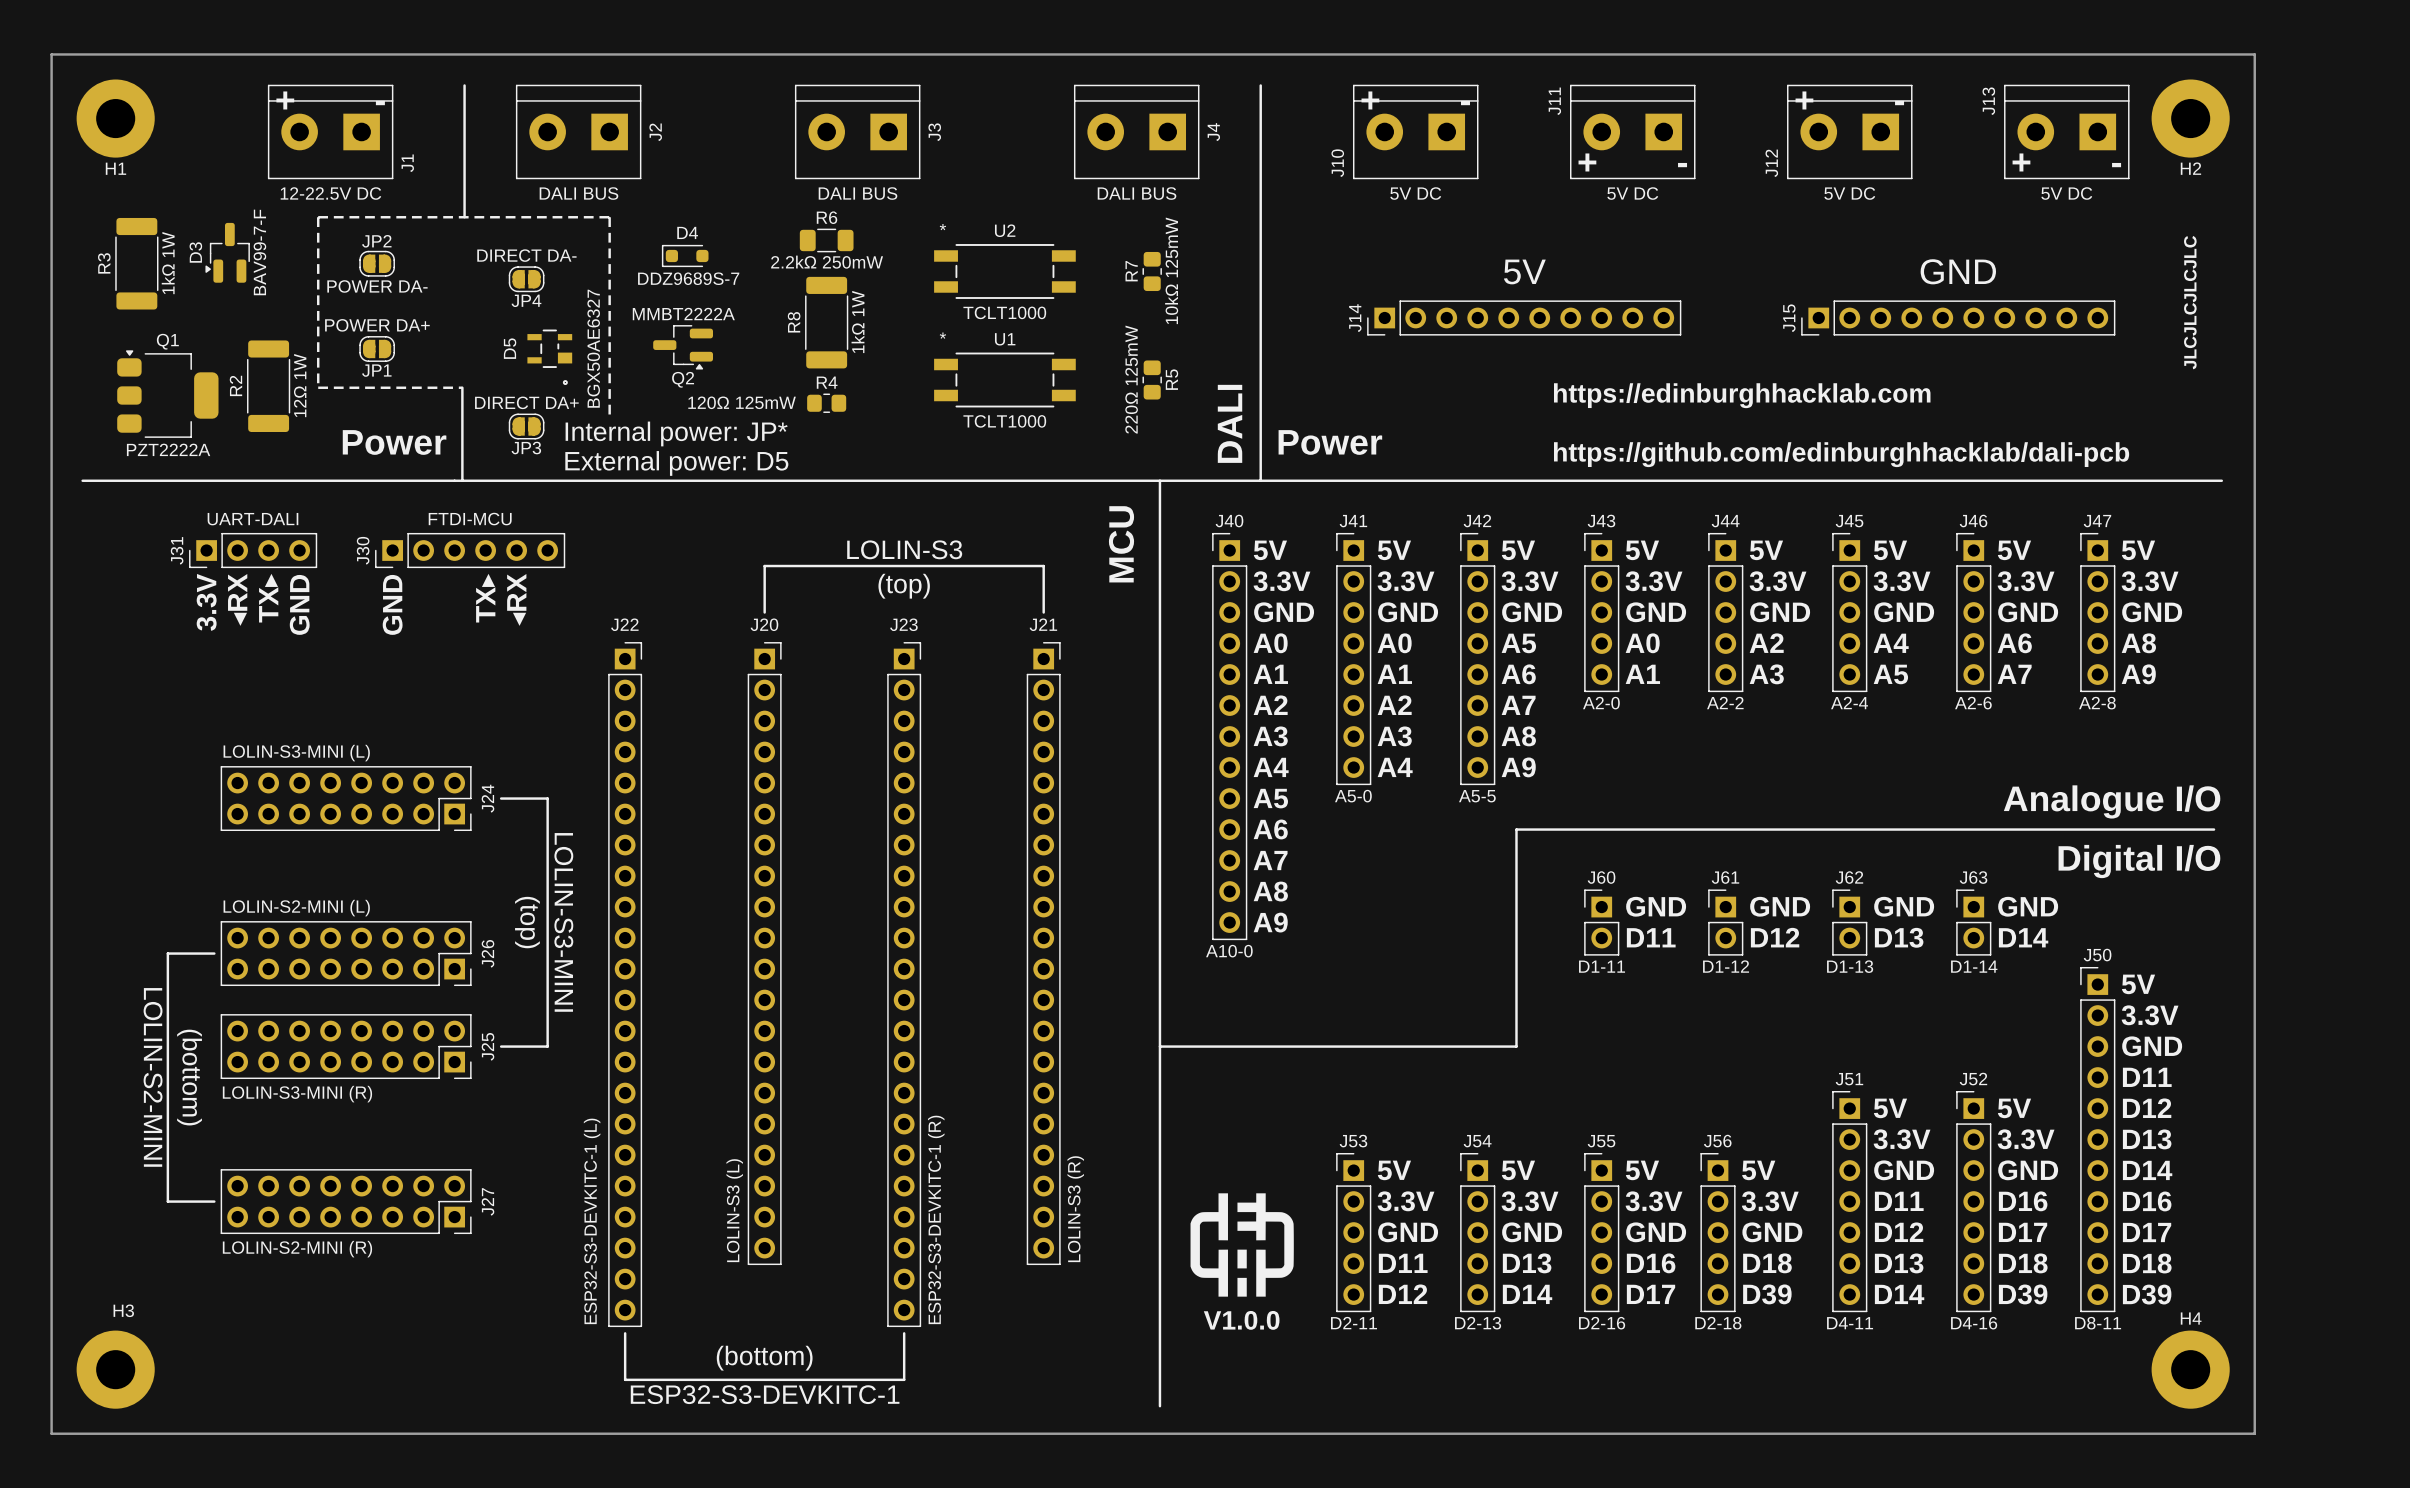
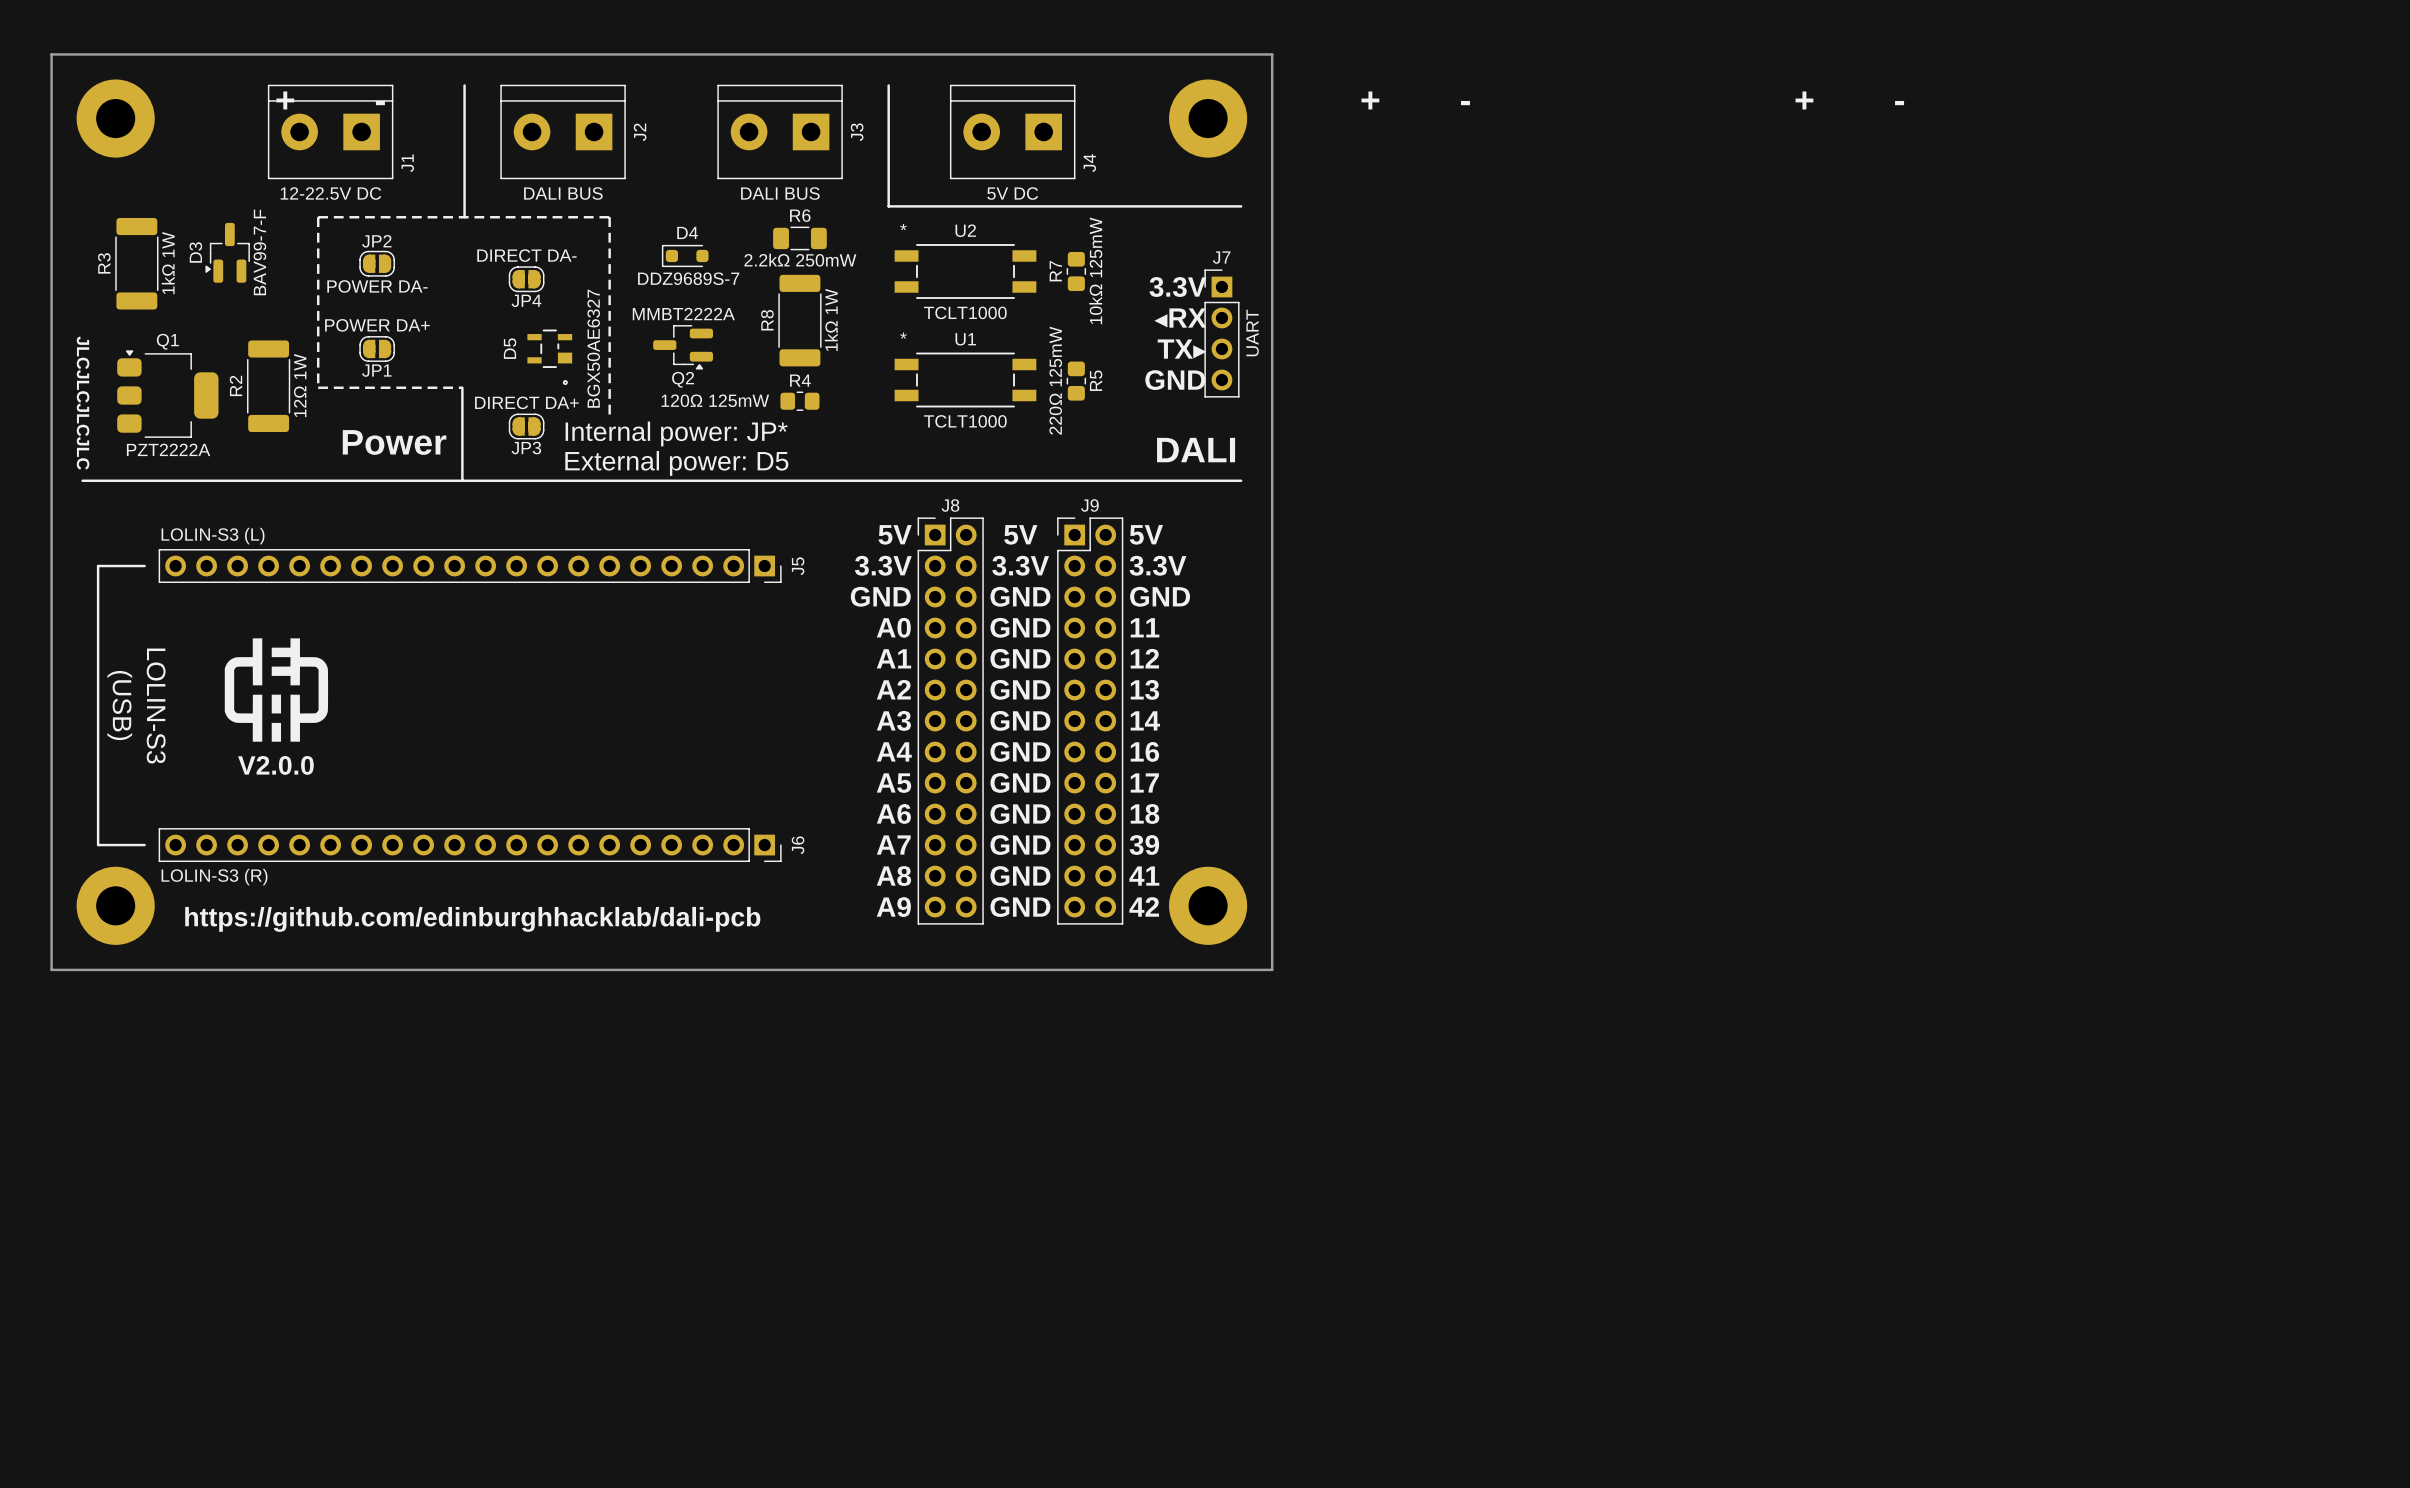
board edge: (1272, 54) (2254, 54) (2254, 1433) (51, 1433) (51, 969) -> (1272, 54) (1272, 969) (51, 969)
line: none -> (888, 85) (888, 206) (1241, 206)
line: (1260, 85) (1260, 480) -> none
part: none -> (1208, 118)
H2: (2190, 118) -> none
J2 position: (578, 131) -> (563, 131)
J3 position: (857, 131) -> (780, 131)
J4 position: (1136, 131) -> (1012, 131)
J10: 5V DC (1415, 131) -> none
J11: 5V DC (1632, 131) -> none
J12: 5V DC (1849, 131) -> none
J13: 5V DC (2066, 131) -> none
J4 name position: J4 (1213, 132) -> J4 (1089, 163)
text: + - (1632, 162) -> none
text: + - (2066, 162) -> none
H1 name: H1 (115, 168) -> none
J4 value: DALI BUS (1137, 193) -> 5V DC (1012, 193)
R6 position: (826, 240) -> (799, 238)
U2 position: (1004, 271) -> (965, 271)
R7 position: (1152, 271) -> (1076, 271)
text: 5V (1524, 271) -> none
text: GND (1958, 271) -> none
text: none -> 3.3V (1177, 287)
text: JLCJLCJLCJLC (2190, 302) -> none
J14: (1524, 317) -> none
J15: (1958, 317) -> none
text: none -> ◂RX (1180, 318)
R8 position: (826, 322) -> (799, 320)
J7: none -> UART (1221, 333)
text: none -> TX▸ (1182, 349)
U1 position: (1004, 380) -> (965, 380)
R5 position: (1152, 380) -> (1076, 381)
text: none -> GND (1175, 380)
text: https://edinburghhacklab.com (1742, 395) -> none
text: none -> JLCJLCJLCJLC (83, 403)
R4 position: (826, 403) -> (799, 401)
text rotation: 0° (1230, 423) -> 90° clockwise (1196, 450)
text: Power (1330, 442) -> none
text: https://github.com/edinburghhacklab/dali-pcb (1841, 454) -> none
line: (1159, 480) (1159, 1406) -> none
line: (1241, 480) (2221, 480) -> none
text: none -> 5V (895, 534)
text: none -> 5V (1020, 534)
text: none -> 5V (1146, 534)
text: MCU (1121, 544) -> none
text: LOLIN-S3 (904, 549) -> 3.3V (883, 565)
J31: UART-DALI (253, 550) -> none
J30: FTDI-MCU (470, 550) -> none
text: 5V (1270, 550) -> none
text: 5V (1394, 550) -> none
text: 5V (1518, 550) -> none
text: 5V (1642, 550) -> none
text: 5V (1766, 550) -> none
text: 5V (1890, 550) -> none
text: 5V (2014, 550) -> none
text: 5V (2138, 550) -> none
text: none -> 3.3V (1020, 565)
text: none -> 3.3V (1157, 565)
line: none -> (144, 566) (98, 566) (98, 845) (144, 845)
J5: none -> LOLIN-S3 (L) (470, 566)
text: 3.3V (1282, 581) -> none
text: 3.3V (1406, 581) -> none
text: 3.3V (1530, 581) -> none
text: 3.3V (1654, 581) -> none
text: 3.3V (1778, 581) -> none
text: 3.3V (1902, 581) -> none
text: 3.3V (2026, 581) -> none
text: 3.3V (2150, 581) -> none
text: (top) (904, 586) -> GND (880, 596)
text: none -> GND (1020, 596)
text: none -> GND (1160, 596)
text: TX▸ (268, 598) -> none
text: TX▸ (485, 598) -> none
text: ◂RX (237, 599) -> none
text: ◂RX (516, 599) -> none
text: 3.3V (206, 602) -> none
text: GND (299, 604) -> none
text: GND (392, 604) -> none
line: (764, 612) (764, 566) (1043, 566) (1043, 612) -> none
text: GND (1284, 612) -> none
text: GND (1408, 612) -> none
text: GND (1532, 612) -> none
J43: A2-0 (1601, 612) -> none
text: GND (1656, 612) -> none
J44: A2-2 (1725, 612) -> none
text: GND (1780, 612) -> none
J45: A2-4 (1849, 612) -> none
text: GND (1904, 612) -> none
J46: A2-6 (1973, 612) -> none
text: GND (2028, 612) -> none
J47: A2-8 (2097, 612) -> none
text: GND (2152, 612) -> none
text: none -> A0 (893, 627)
text: none -> GND (1020, 627)
text: none -> 11 (1145, 627)
drawing: none -> [224, 638, 329, 742]
text: A0 (1270, 643) -> none
text: A0 (1394, 643) -> none
text: A5 (1518, 643) -> none
text: A0 (1642, 643) -> none
text: A2 (1766, 643) -> none
text: A4 (1891, 643) -> none
text: A6 (2014, 643) -> none
text: A8 (2138, 643) -> none
text: none -> A1 (893, 658)
text: none -> GND (1020, 658)
text: none -> 12 (1144, 658)
J41: A5-0 (1353, 659) -> none
J42: A5-5 (1477, 659) -> none
text: A1 (1270, 674) -> none
text: A1 (1394, 674) -> none
text: A6 (1518, 674) -> none
text: A1 (1642, 674) -> none
text: A3 (1766, 674) -> none
text: A5 (1890, 674) -> none
text: A7 (2014, 674) -> none
text: A9 (2138, 674) -> none
text: none -> A2 (893, 689)
text: none -> GND (1020, 689)
text: none -> 13 (1144, 689)
text: none -> (USB) (119, 705)
text: A2 (1270, 705) -> none
text: A2 (1394, 705) -> none
text: A7 (1518, 705) -> none
text: none -> LOLIN-S3 (156, 706)
text: none -> A3 (893, 720)
text: none -> GND (1020, 720)
text: none -> 14 (1145, 720)
J8: none -> (950, 721)
J9: none -> (1090, 721)
J40: A10-0 (1229, 736) -> none
text: A3 (1270, 736) -> none
text: A3 (1394, 736) -> none
text: A8 (1518, 736) -> none
text: none -> A4 (894, 751)
text: none -> GND (1020, 751)
text: none -> 16 (1144, 751)
text: none -> V2.0.0 (275, 765)
text: A4 (1271, 767) -> none
text: A4 (1395, 767) -> none
text: A9 (1518, 767) -> none
text: none -> GND (1020, 782)
text: none -> 17 (1144, 782)
text: none -> A5 (893, 783)
J24: LOLIN-S3-MINI (L) (346, 798) -> none
line: (501, 798) (547, 798) (547, 1046) (501, 1046) -> none
text: A5 (1270, 798) -> none
text: Analogue I/O (2112, 801) -> none
text: none -> A6 (893, 813)
text: none -> GND (1020, 813)
text: none -> 18 (1144, 813)
text: A6 (1270, 829) -> none
line: (2214, 829) (1516, 829) (1516, 1046) (1159, 1046) -> none
J6: none -> LOLIN-S3 (R) (470, 845)
text: none -> A7 (893, 845)
text: none -> GND (1020, 845)
text: none -> 39 (1144, 845)
text: A7 (1270, 860) -> none
text: Digital I/O (2139, 861) -> none
text: none -> A8 (893, 876)
text: none -> GND (1020, 876)
text: none -> 41 (1144, 876)
text: A8 (1270, 891) -> none
part: none -> (115, 905)
part: none -> (1208, 905)
text: none -> 42 (1144, 906)
text: GND (1656, 906) -> none
text: GND (1780, 906) -> none
text: GND (1904, 906) -> none
text: GND (2028, 906) -> none
text: none -> A9 (893, 907)
text: none -> GND (1020, 907)
text: none -> https://github.com/edinburghhacklab/dali-pcb (472, 919)
text: (top) (527, 922) -> none
text: LOLIN-S3-MINI (563, 922) -> none
text: A9 (1270, 922) -> none
J60: D1-11 (1601, 922) -> none
J61: D1-12 (1725, 922) -> none
J62: D1-13 (1849, 922) -> none
J63: D1-14 (1973, 922) -> none
text: D11 (1651, 937) -> none
text: D12 (1775, 937) -> none
text: D13 (1899, 937) -> none
text: D14 (2023, 937) -> none
line: (214, 953) (167, 953) (167, 1201) (214, 1201) -> none
J26: LOLIN-S2-MINI (L) (346, 953) -> none
J20: LOLIN-S3 (L) (764, 953) -> none
J21: LOLIN-S3 (R) (1043, 953) -> none
J22: ESP32-S3-DEVKITC-1 (L) (625, 984) -> none
J23: ESP32-S3-DEVKITC-1 (R) (904, 984) -> none
text: 5V (2138, 984) -> none
text: 3.3V (2150, 1015) -> none
J25: LOLIN-S3-MINI (R) (346, 1046) -> none
text: GND (2152, 1046) -> none
text: LOLIN-S2-MINI (153, 1077) -> none
text: (bottom) (189, 1077) -> none
text: D11 (2147, 1077) -> none
text: 5V (1890, 1108) -> none
text: 5V (2014, 1108) -> none
text: D12 (2147, 1108) -> none
text: 3.3V (1902, 1139) -> none
text: 3.3V (2026, 1139) -> none
J50: D8-11 (2097, 1139) -> none
text: D13 (2147, 1139) -> none
text: 5V (1394, 1170) -> none
text: 5V (1518, 1170) -> none
text: 5V (1642, 1170) -> none
text: 5V (1758, 1170) -> none
text: GND (1904, 1170) -> none
text: GND (2028, 1170) -> none
text: D14 (2147, 1170) -> none
drawing: [1190, 1193, 1294, 1297] -> none
J27: LOLIN-S2-MINI (R) (346, 1201) -> none
text: 3.3V (1406, 1201) -> none
text: 3.3V (1530, 1201) -> none
text: 3.3V (1654, 1201) -> none
text: 3.3V (1770, 1201) -> none
J51: D4-11 (1849, 1201) -> none
text: D11 (1899, 1201) -> none
J52: D4-16 (1973, 1201) -> none
text: D16 (2023, 1201) -> none
text: D16 (2147, 1201) -> none
J53: D2-11 (1353, 1232) -> none
text: GND (1408, 1232) -> none
J54: D2-13 (1477, 1232) -> none
text: GND (1532, 1232) -> none
J55: D2-16 (1601, 1232) -> none
text: GND (1656, 1232) -> none
J56: D2-18 (1718, 1232) -> none
text: GND (1772, 1232) -> none
text: D12 (1899, 1232) -> none
text: D17 (2023, 1232) -> none
text: D17 (2147, 1232) -> none
text: D11 (1403, 1263) -> none
text: D13 (1527, 1263) -> none
text: D16 (1651, 1263) -> none
text: D18 (1767, 1263) -> none
text: D13 (1899, 1263) -> none
text: D18 (2023, 1263) -> none
text: D18 (2147, 1263) -> none
text: D12 (1403, 1294) -> none
text: D14 (1527, 1294) -> none
text: D17 (1651, 1294) -> none
text: D39 (1767, 1294) -> none
text: D14 (1899, 1294) -> none
text: D39 (2023, 1294) -> none
text: D39 (2147, 1294) -> none
text: V1.0.0 (1241, 1320) -> none
line: (625, 1333) (625, 1379) (904, 1379) (904, 1333) -> none
text: (bottom) (764, 1358) -> none
H3: (115, 1369) -> none
H4: (2190, 1369) -> none
text: ESP32-S3-DEVKITC-1 (765, 1394) -> none

